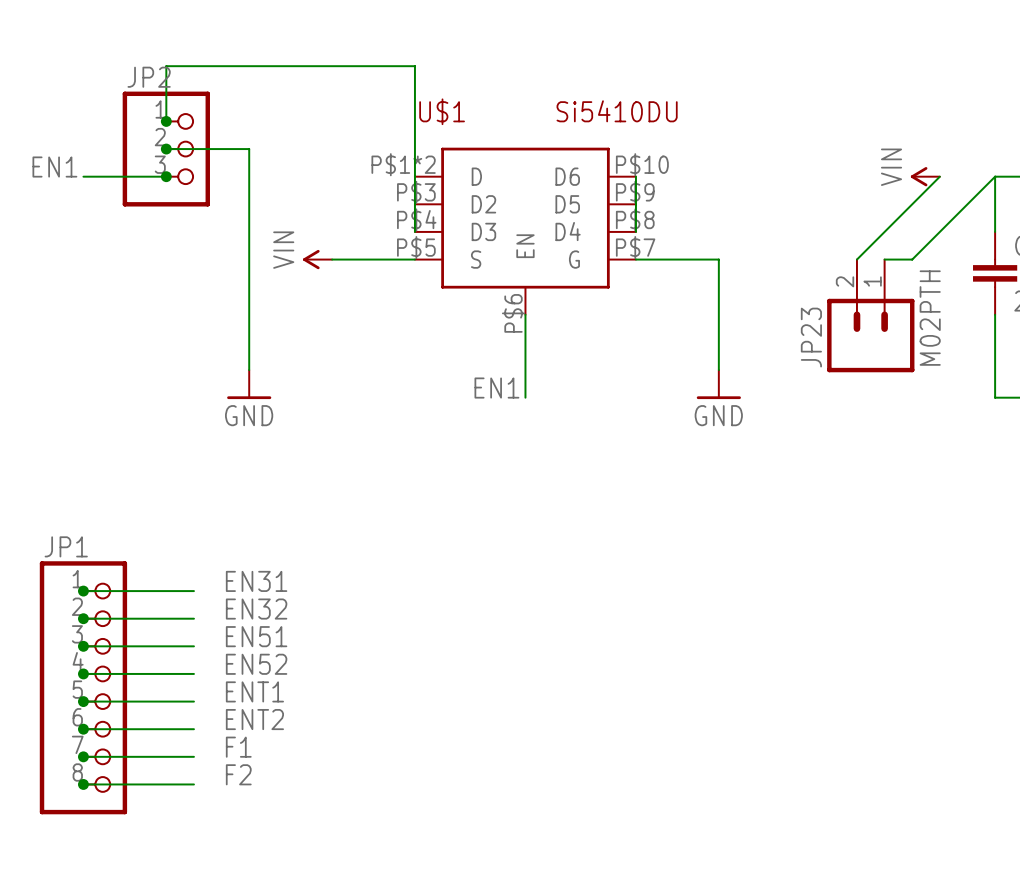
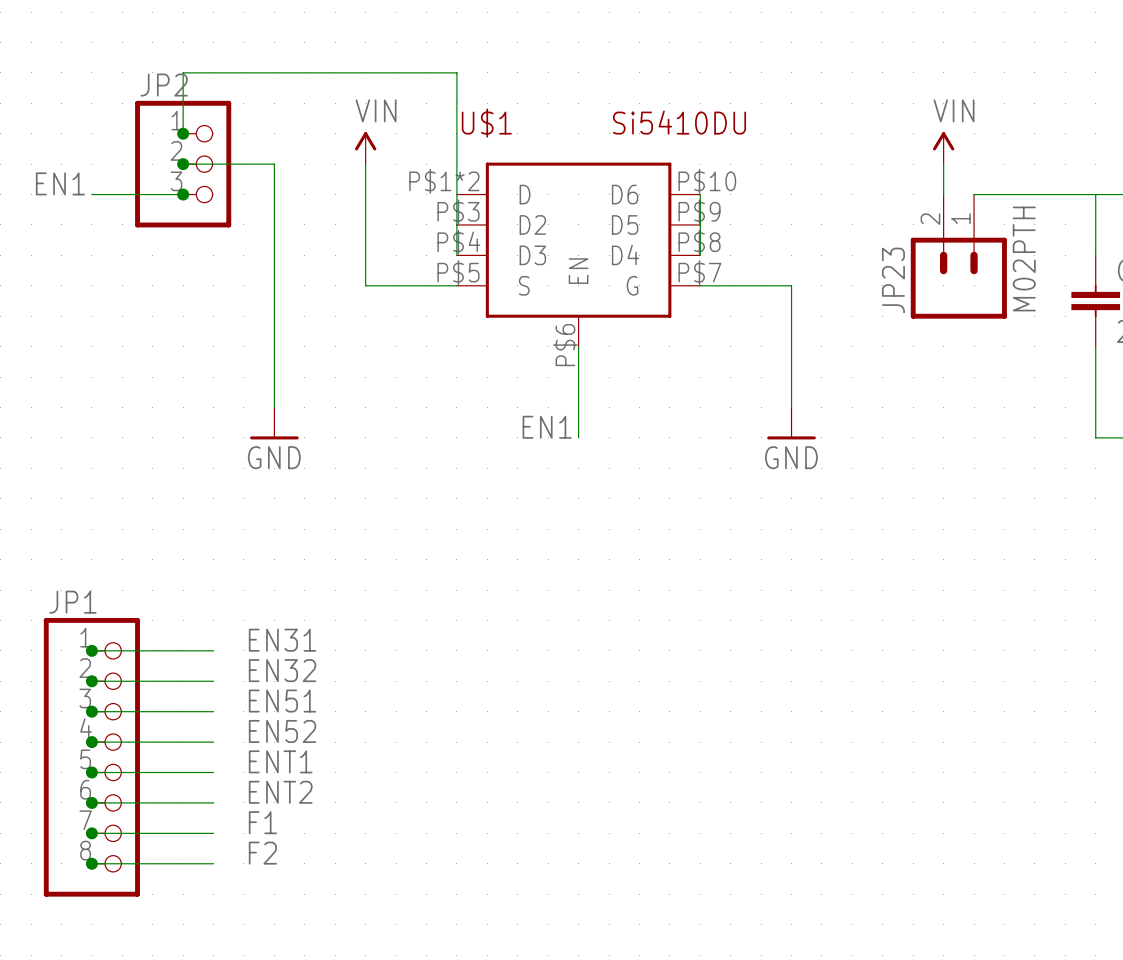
wire: none -> (365, 164) (365, 285)
wire: none -> (943, 164) (943, 194)
power symbol rotation: 0° (919, 176) -> 90° clockwise (943, 141)
power symbol position: VIN (925, 176) -> VIN (943, 148)
wire: (939, 176) (856, 259) -> none
wire: (995, 176) (912, 259) (884, 259) -> (1095, 194) (974, 194)
power symbol rotation: 0° (311, 259) -> 90° clockwise (365, 141)
power symbol position: VIN (317, 259) -> VIN (365, 148)
JP23 position: (870, 315) -> (958, 256)

